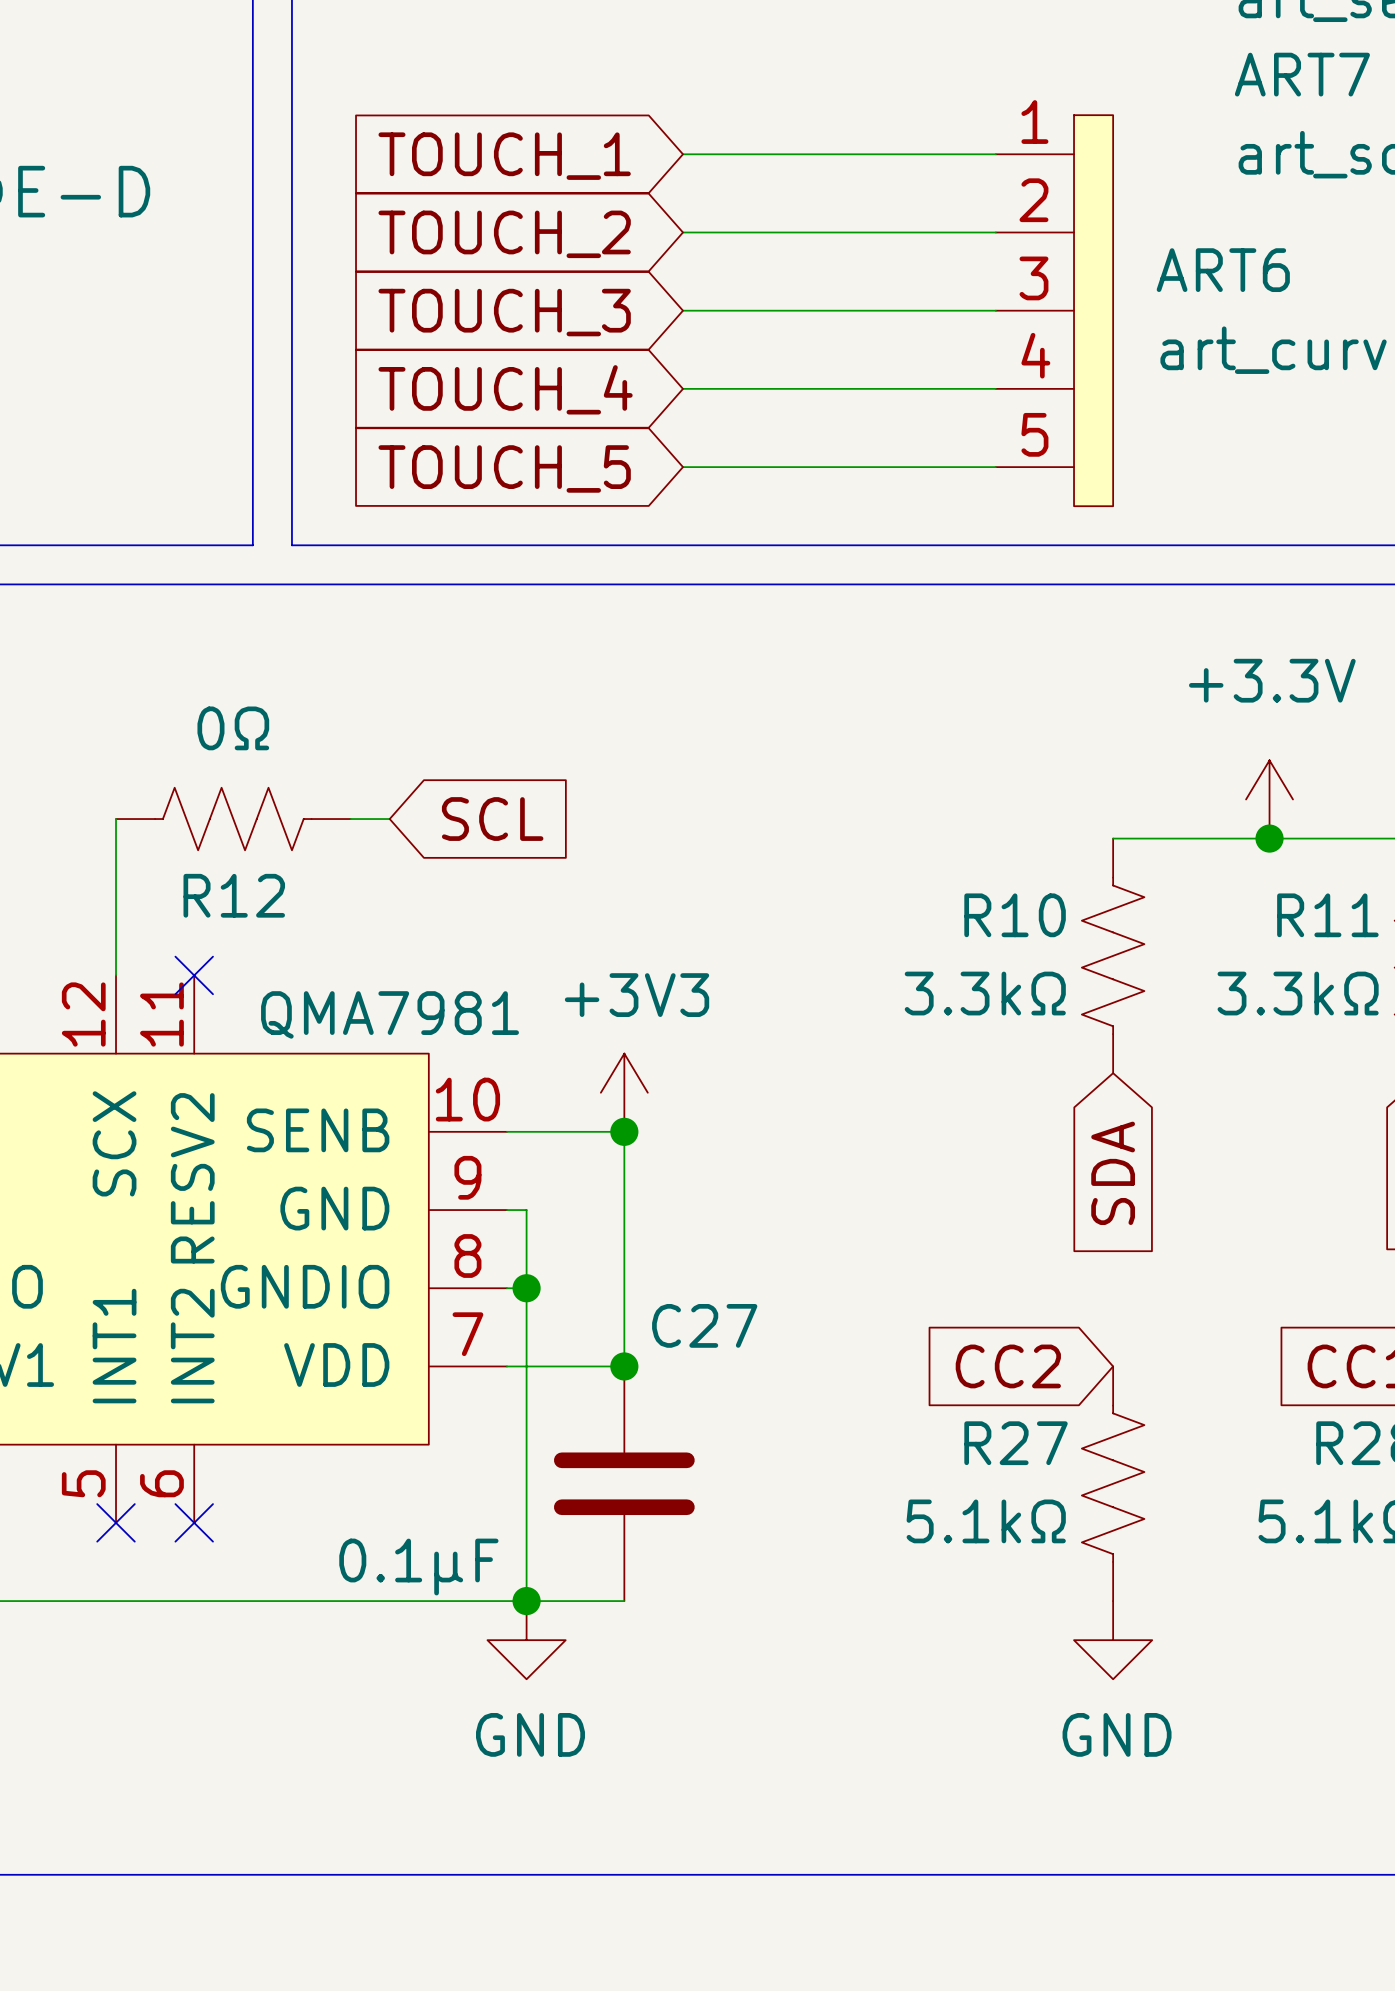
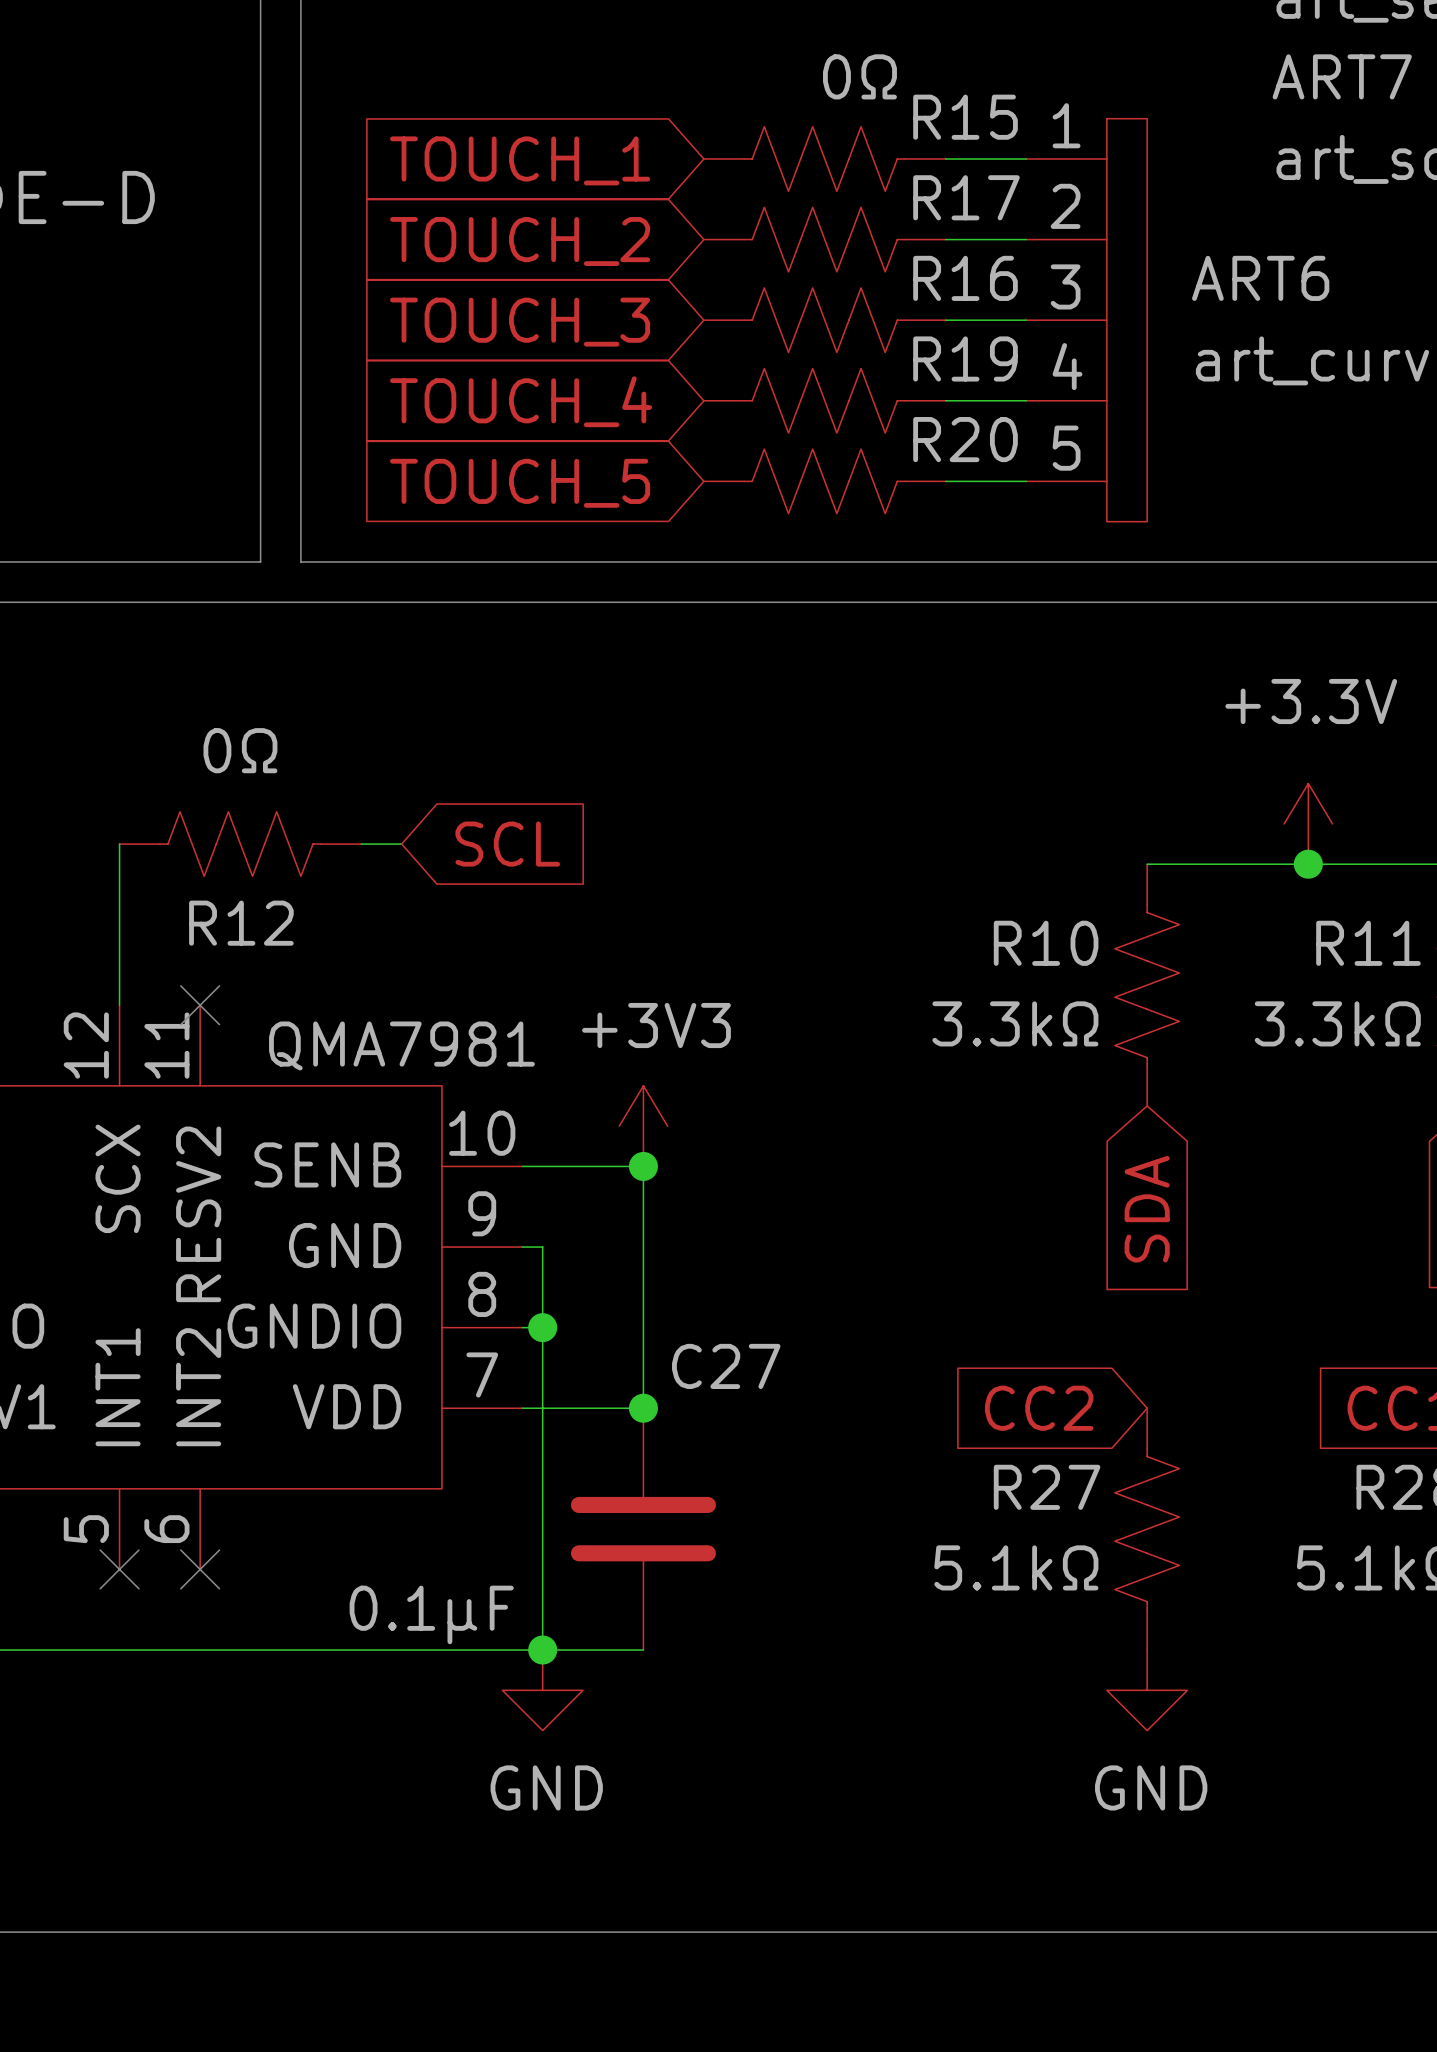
wire: (682, 154) (917, 154) -> none
R15: none -> 0Ω (824, 158)
wire: (682, 232) (917, 232) -> none
R17: none -> (824, 239)
wire: (682, 310) (917, 310) -> none
R16: none -> (824, 320)
wire: (682, 388) (917, 388) -> none
R19: none -> (824, 400)
wire: (682, 467) (917, 467) -> none
R20: none -> (824, 481)

